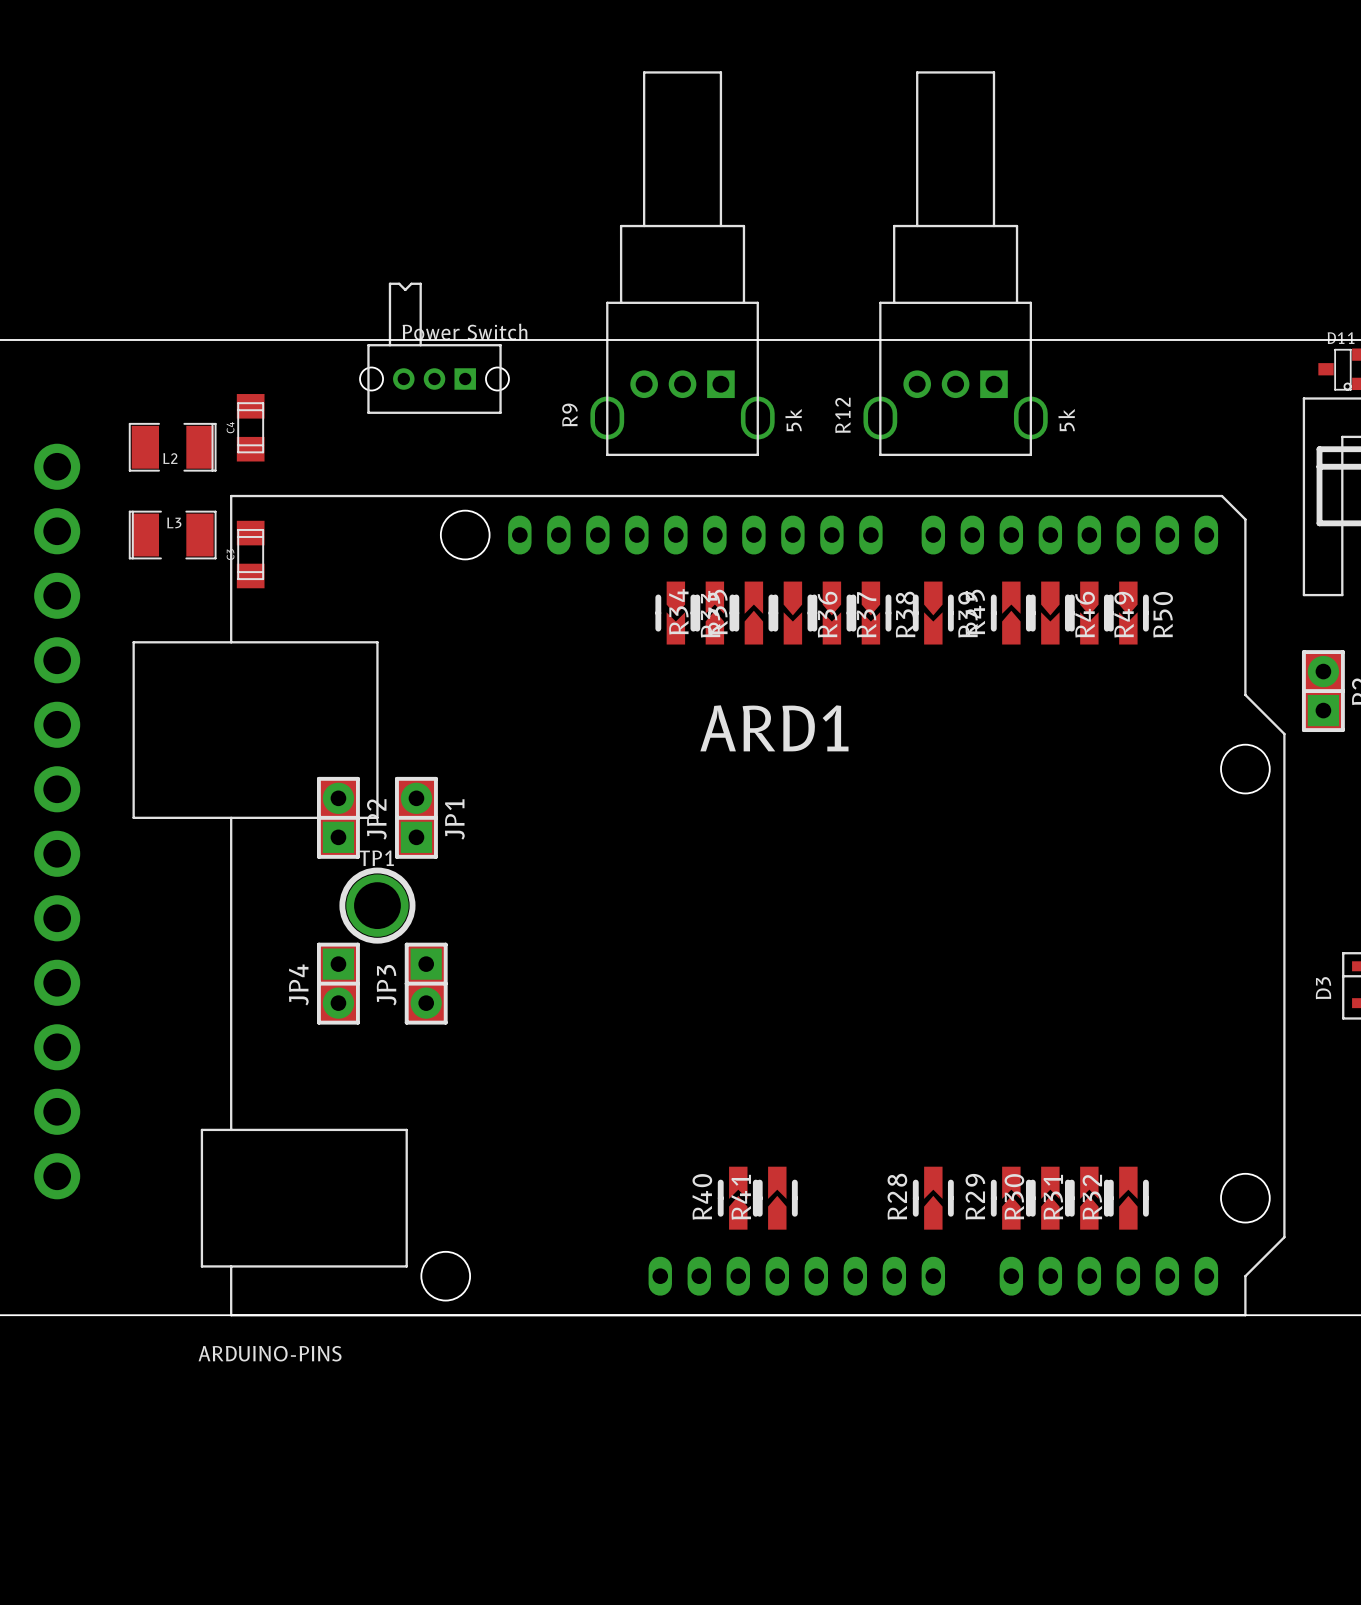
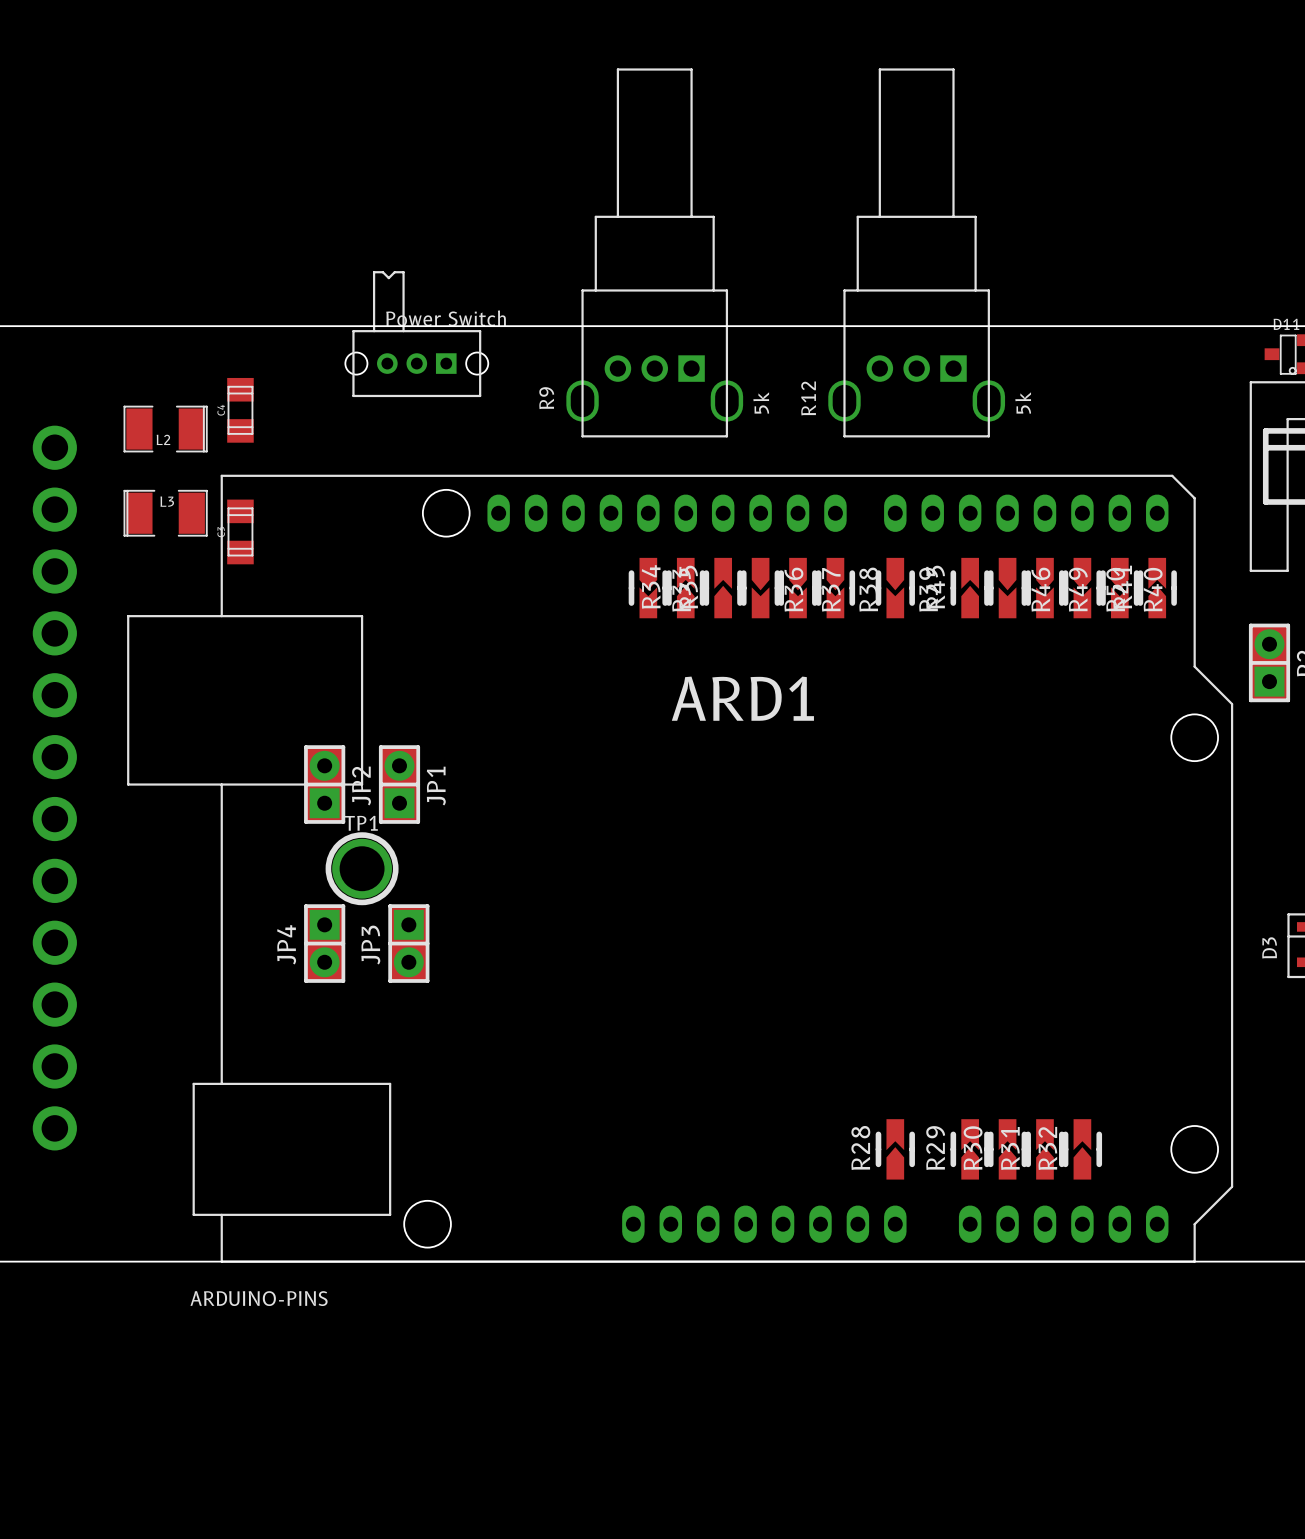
R40 rotation: 0° (738, 1198) -> 180° (1119, 588)
R40 position: (738, 1198) -> (1119, 588)
R41 position: (777, 1198) -> (1157, 588)

